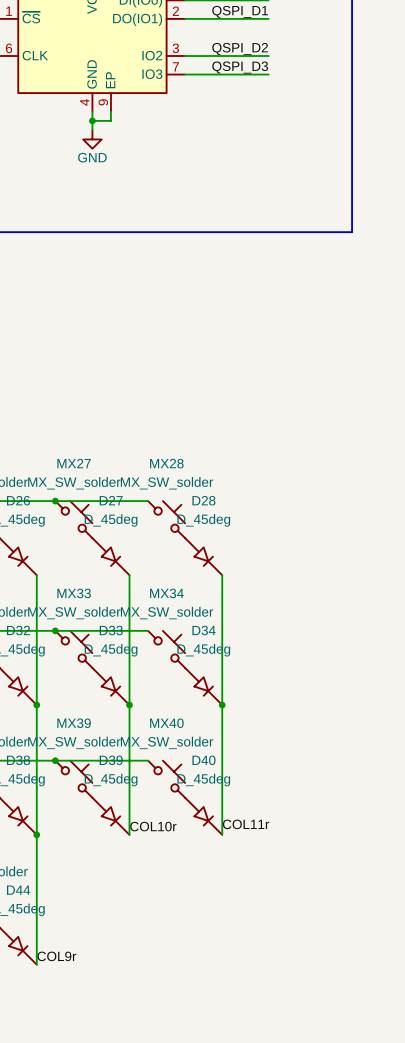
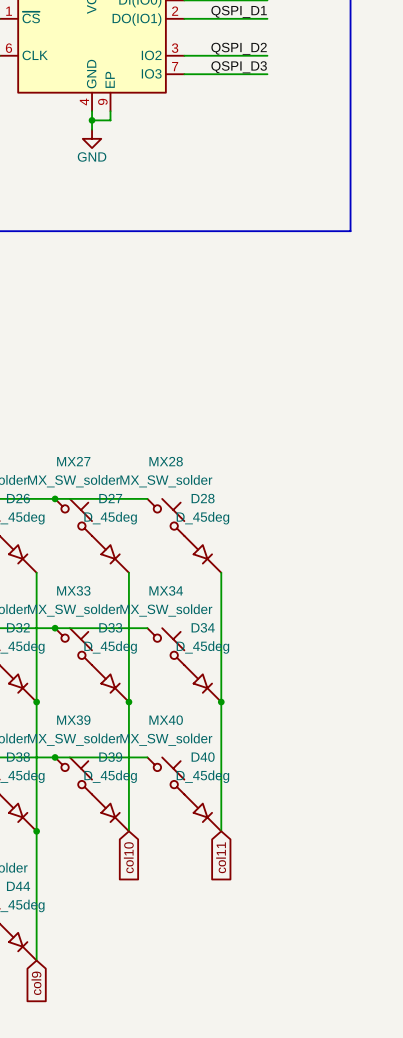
label: COL11r (246, 824) -> none
label: COL10r (153, 826) -> none
global label: none -> col10 (128, 857)
global label: none -> col11 (221, 857)
label: COL9r (56, 956) -> none
global label: none -> col9 (36, 983)

